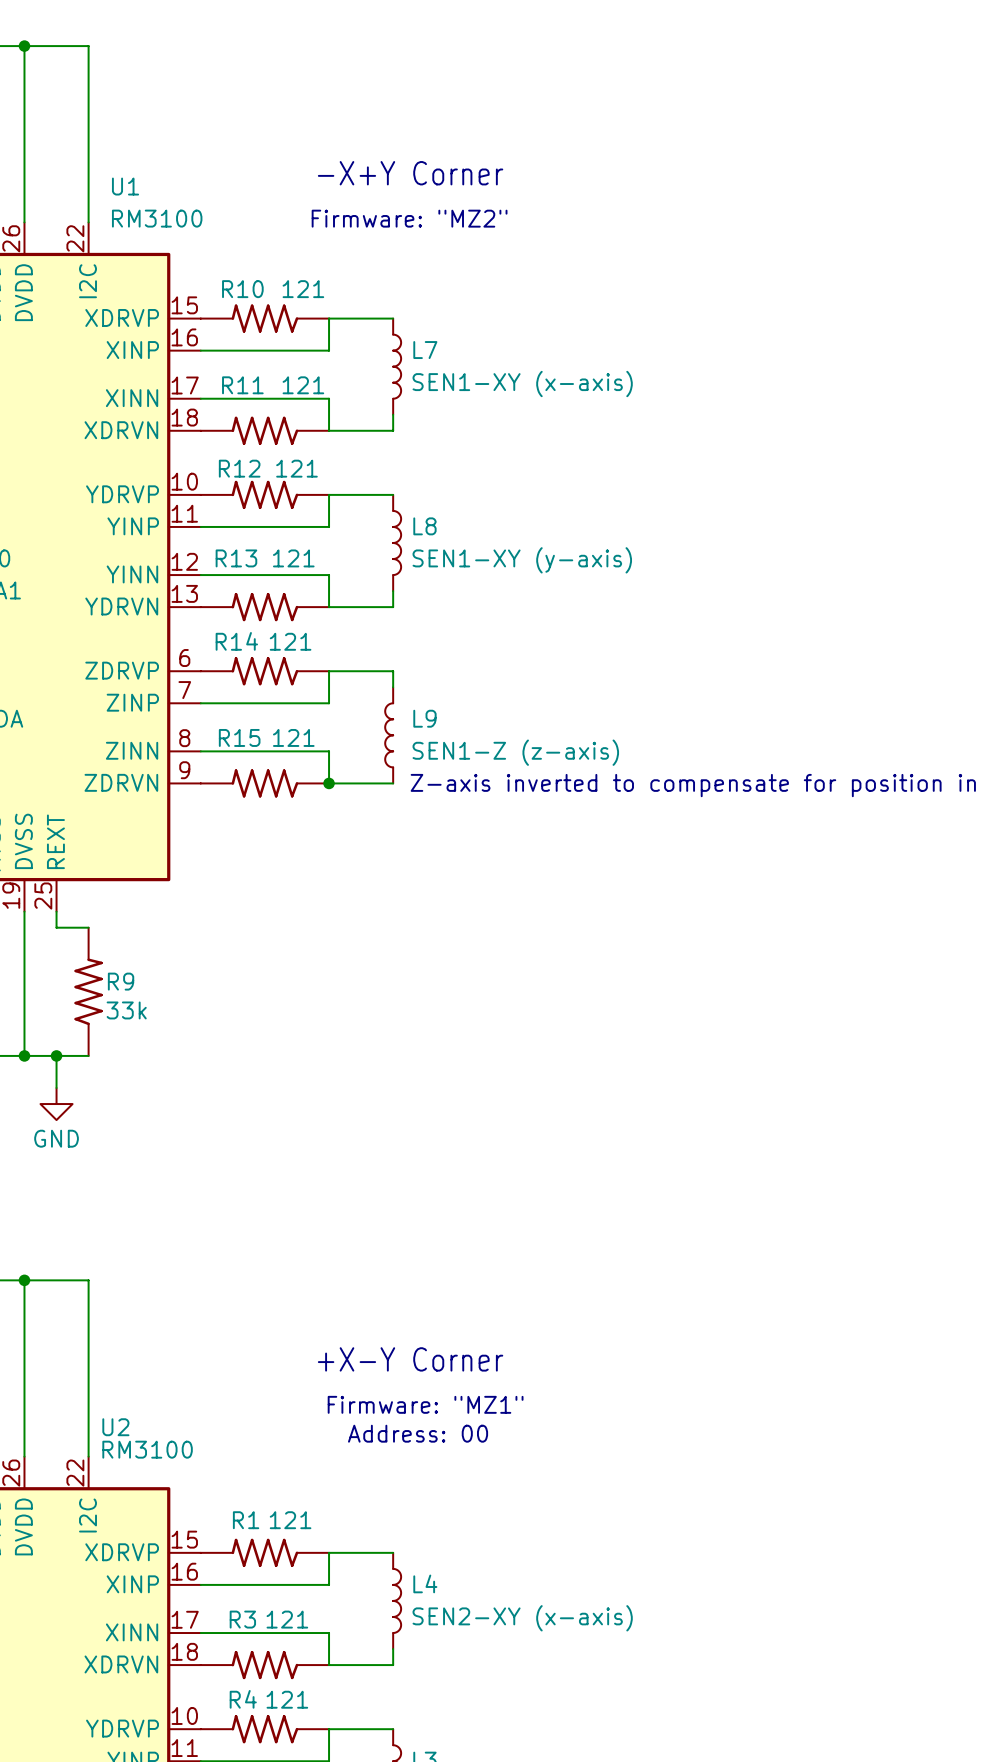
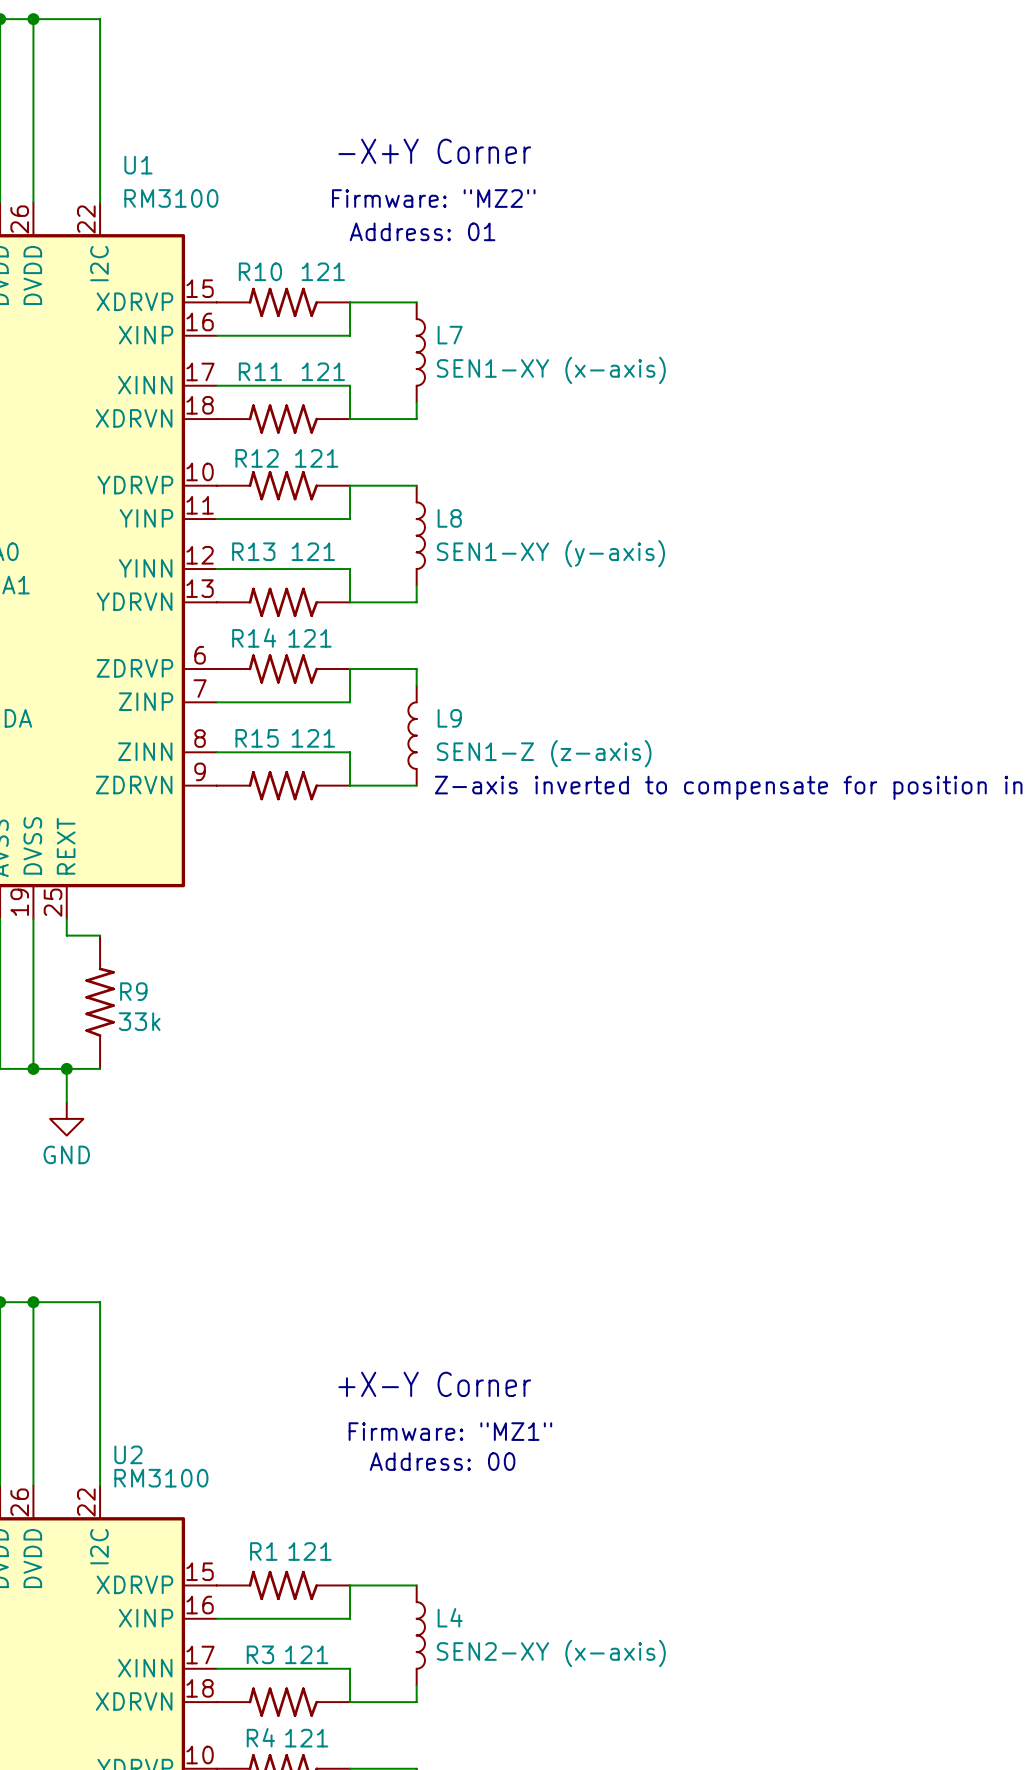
text: none -> Address: 01 (422, 231)
junction: (329, 783) -> none

